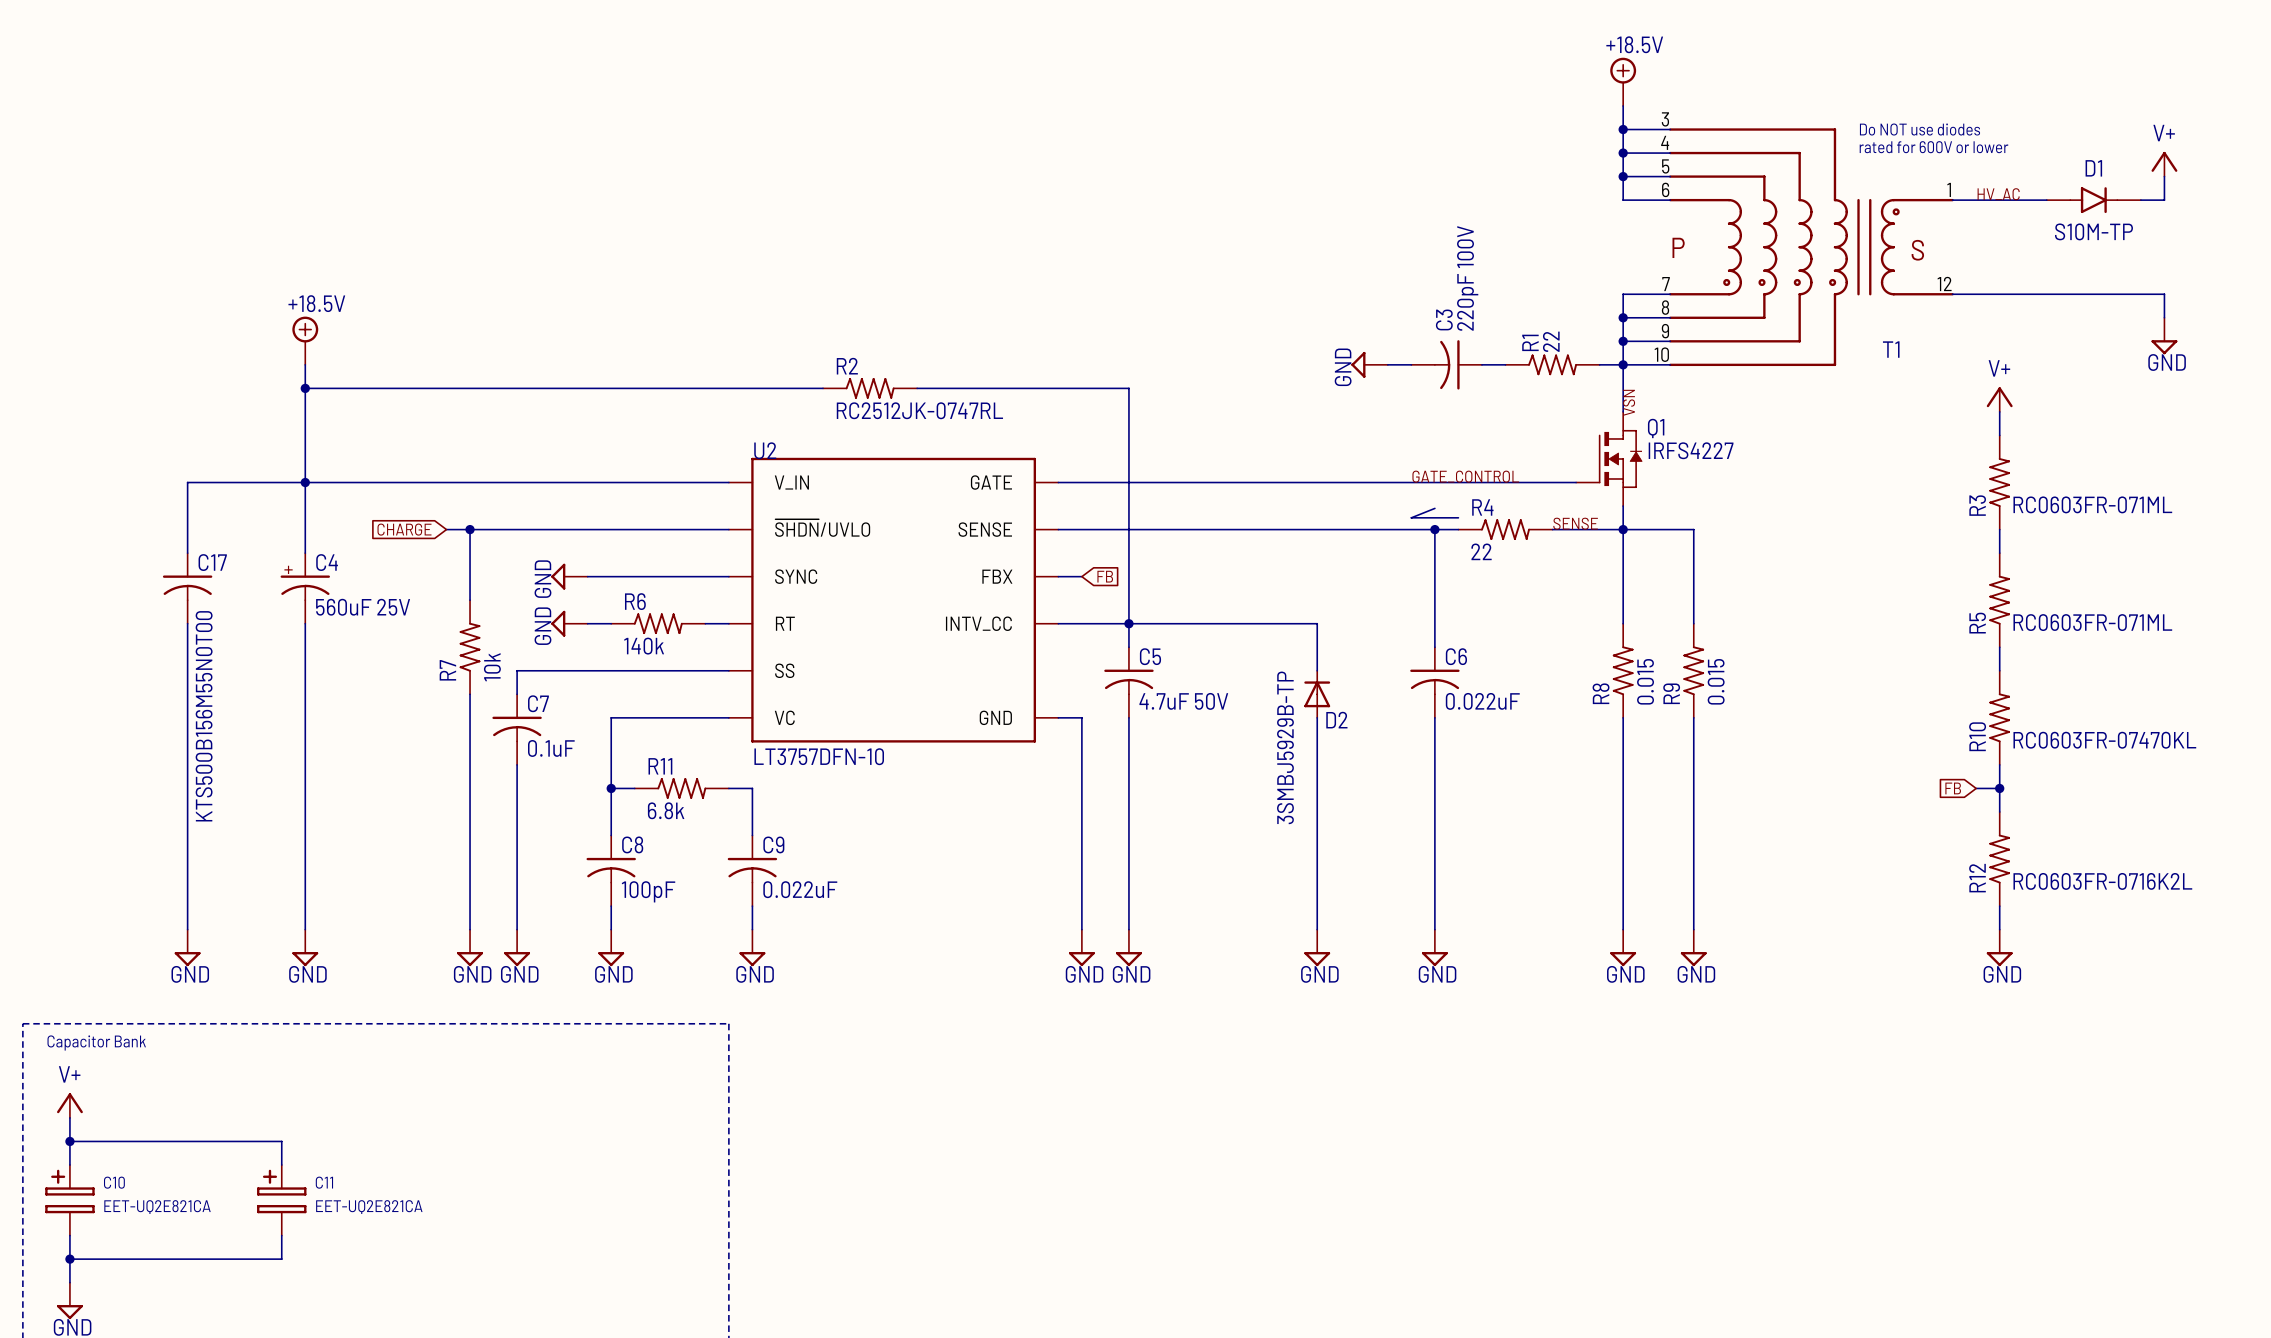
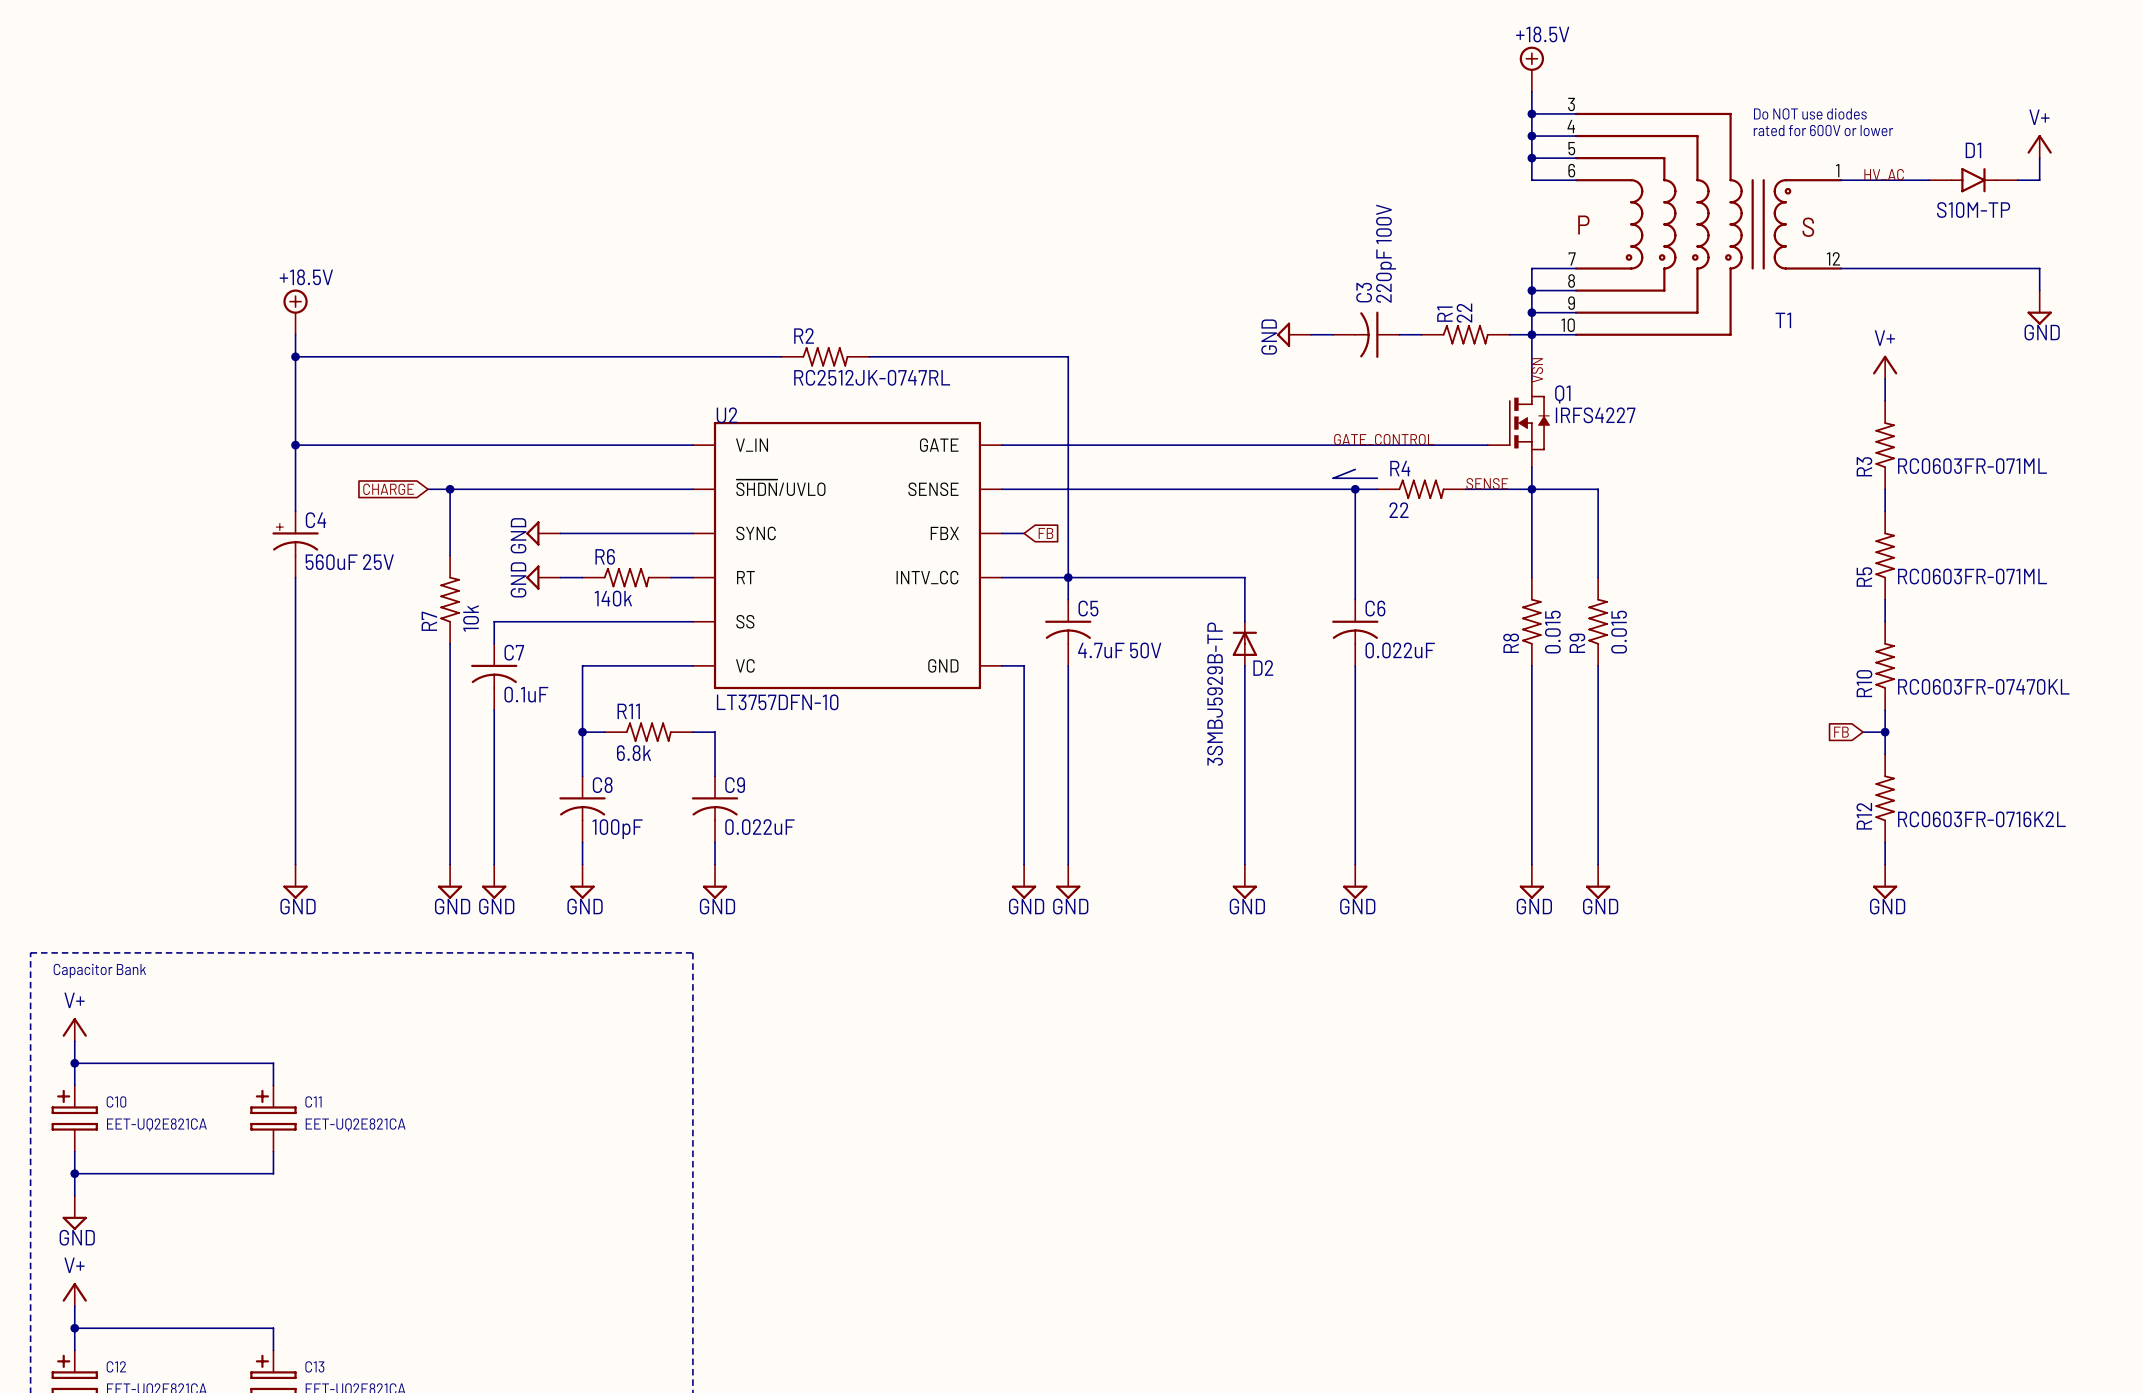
wire: (305, 482) (187, 482) (187, 553) -> none
C17: KTS500B156M55N0T00 (187, 588) -> none
wire: (187, 623) (187, 929) -> none
power symbol: GND (187, 947) -> none

